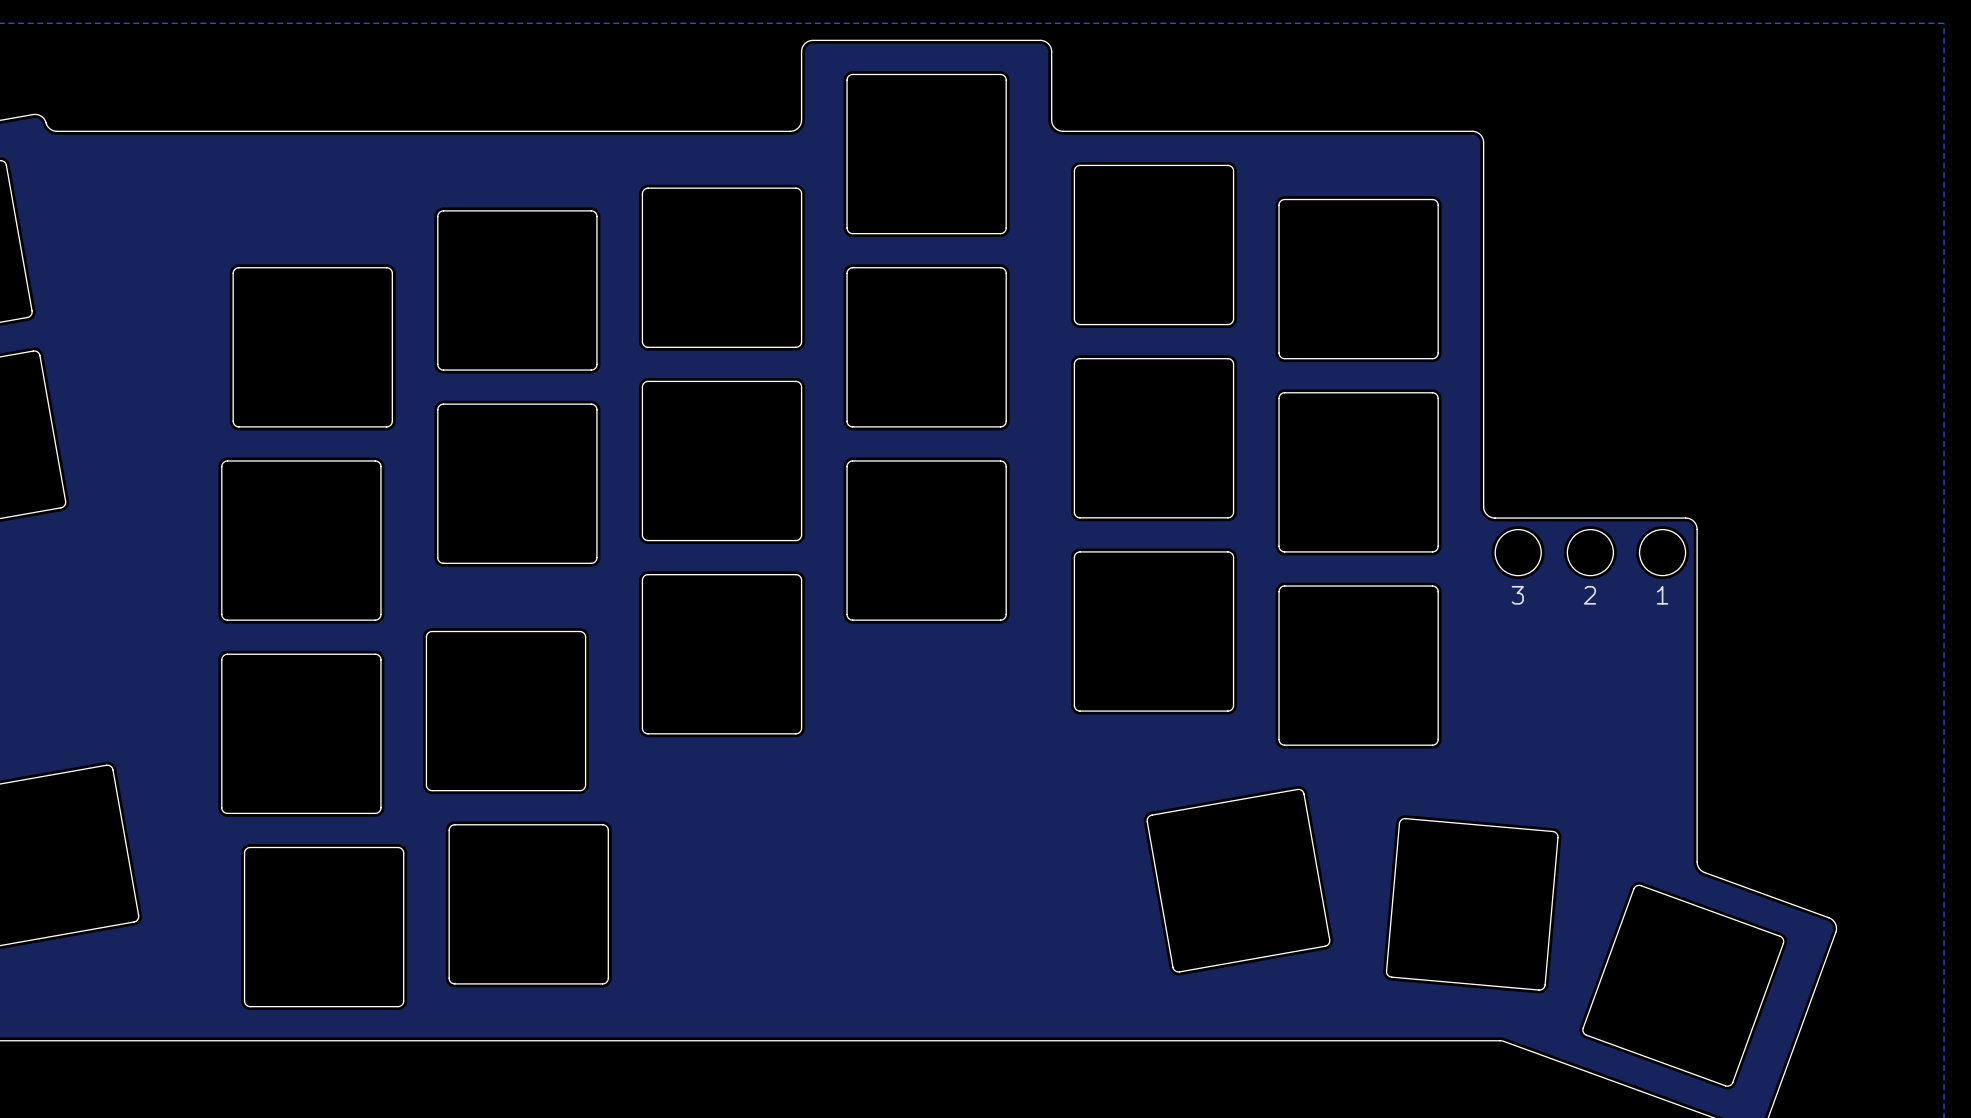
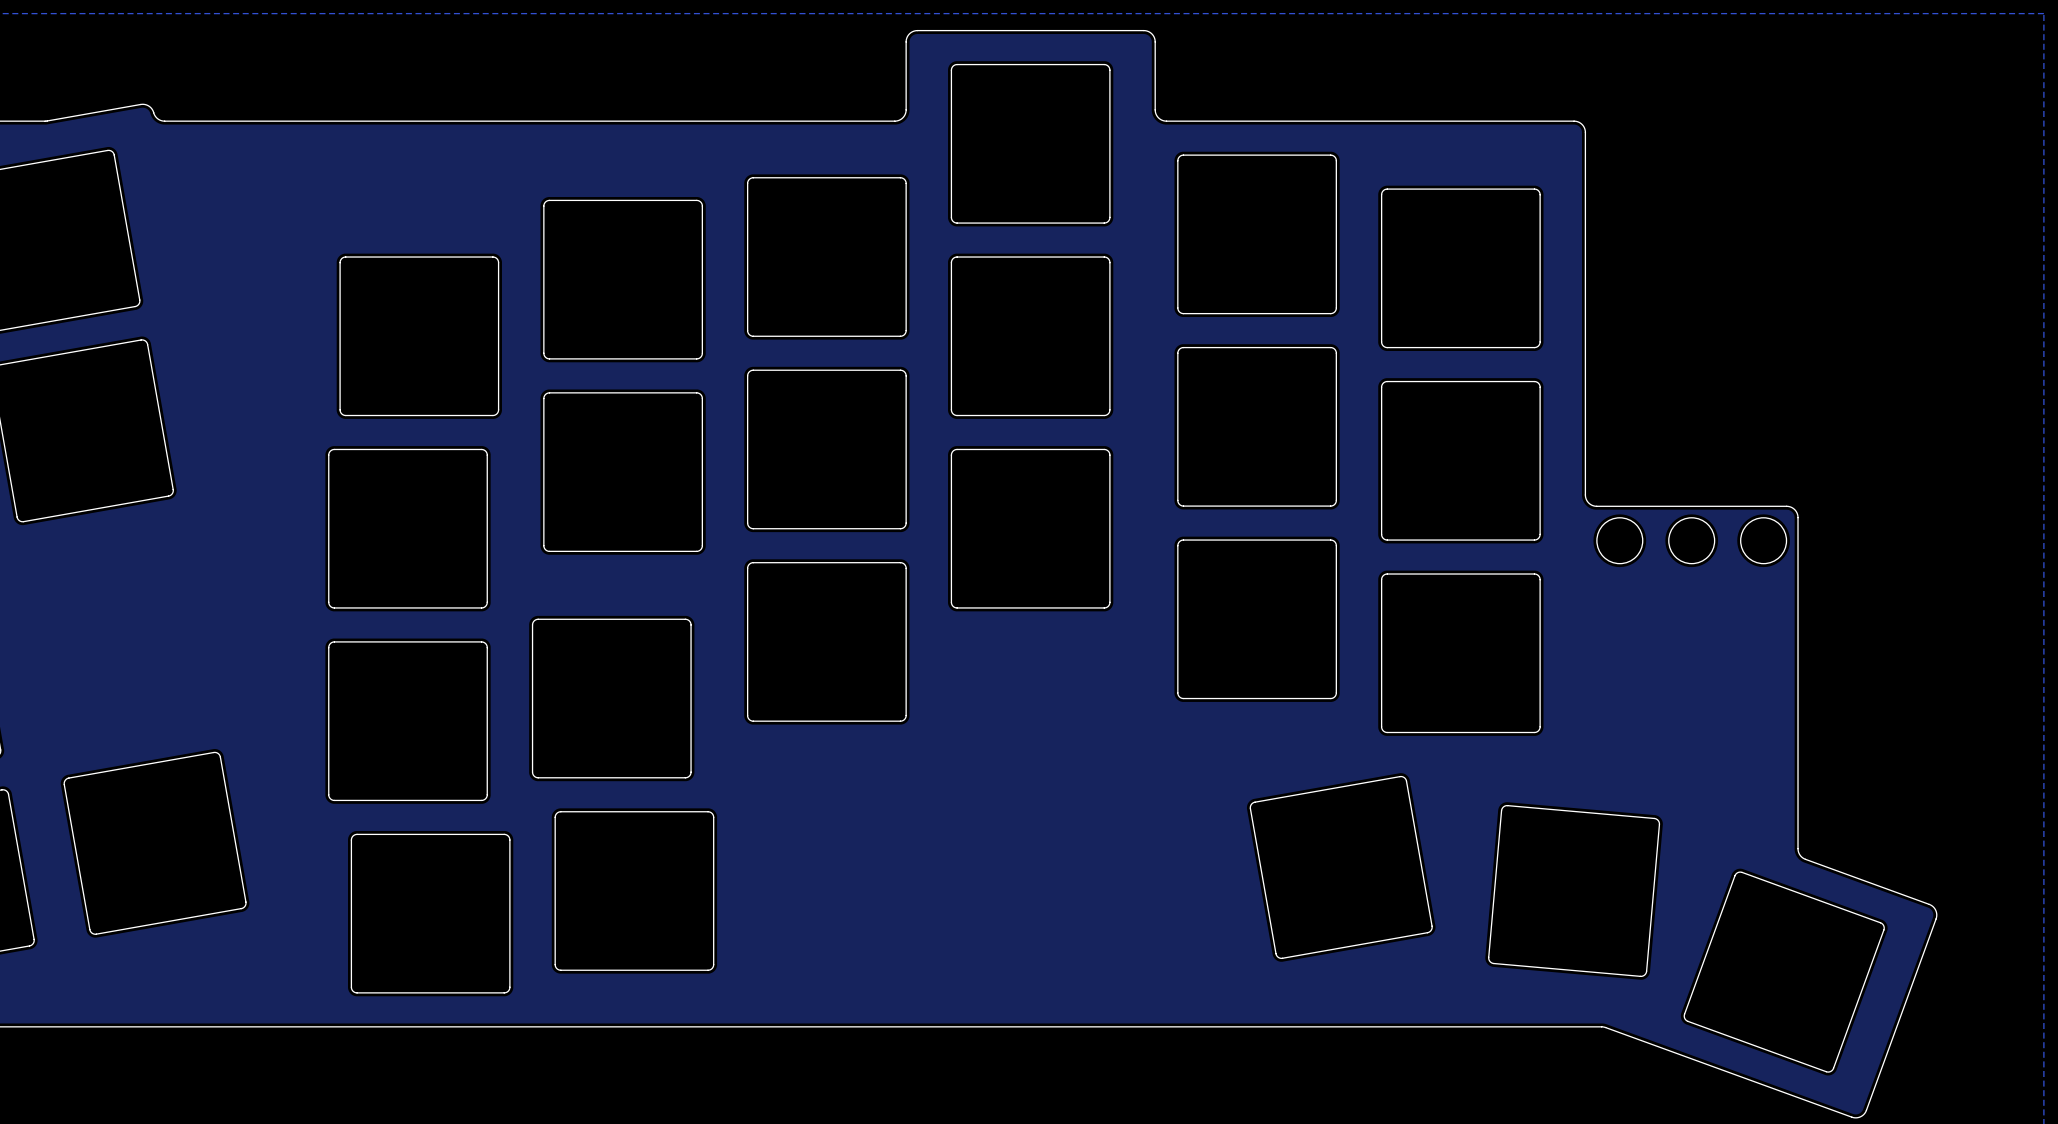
drawing shape: [1494, 529, 1542, 605] -> [1596, 517, 1644, 564]
drawing shape: [1567, 529, 1614, 605] -> [1668, 517, 1715, 564]
drawing shape: [1639, 529, 1686, 605] -> [1740, 517, 1787, 564]

